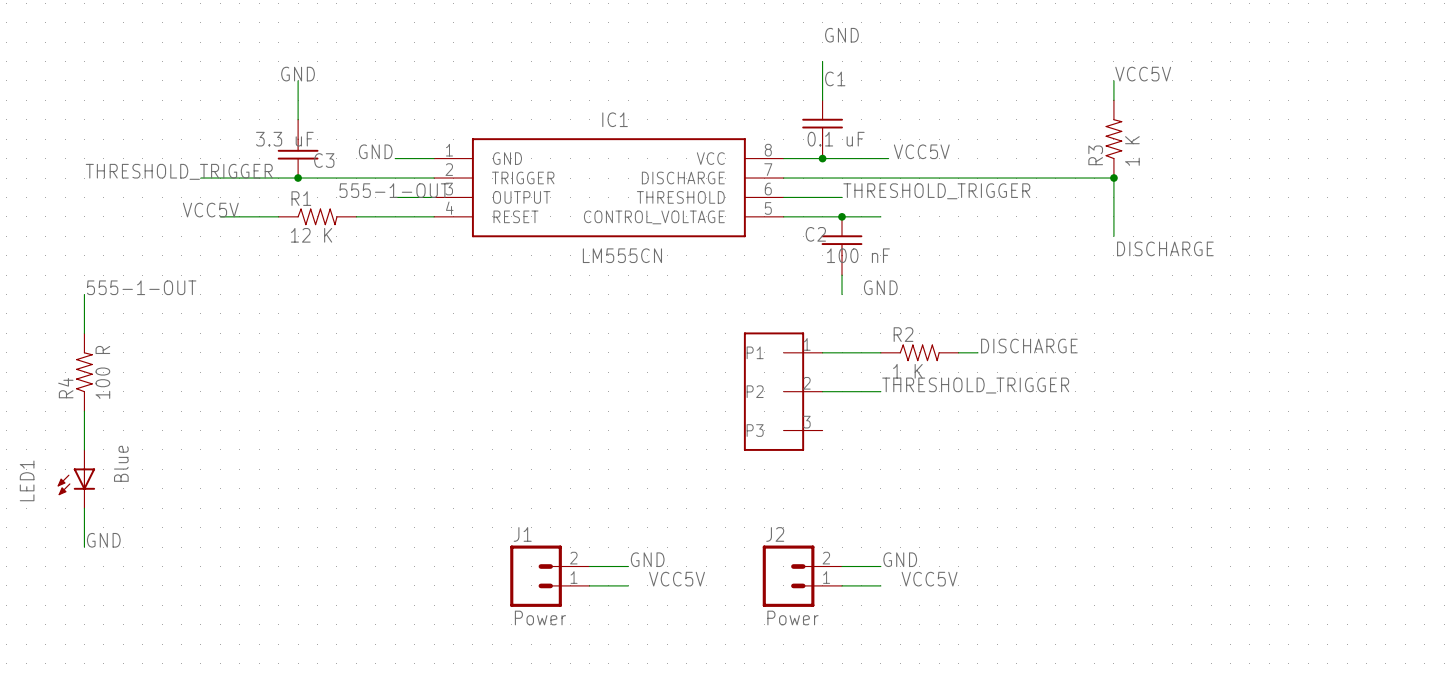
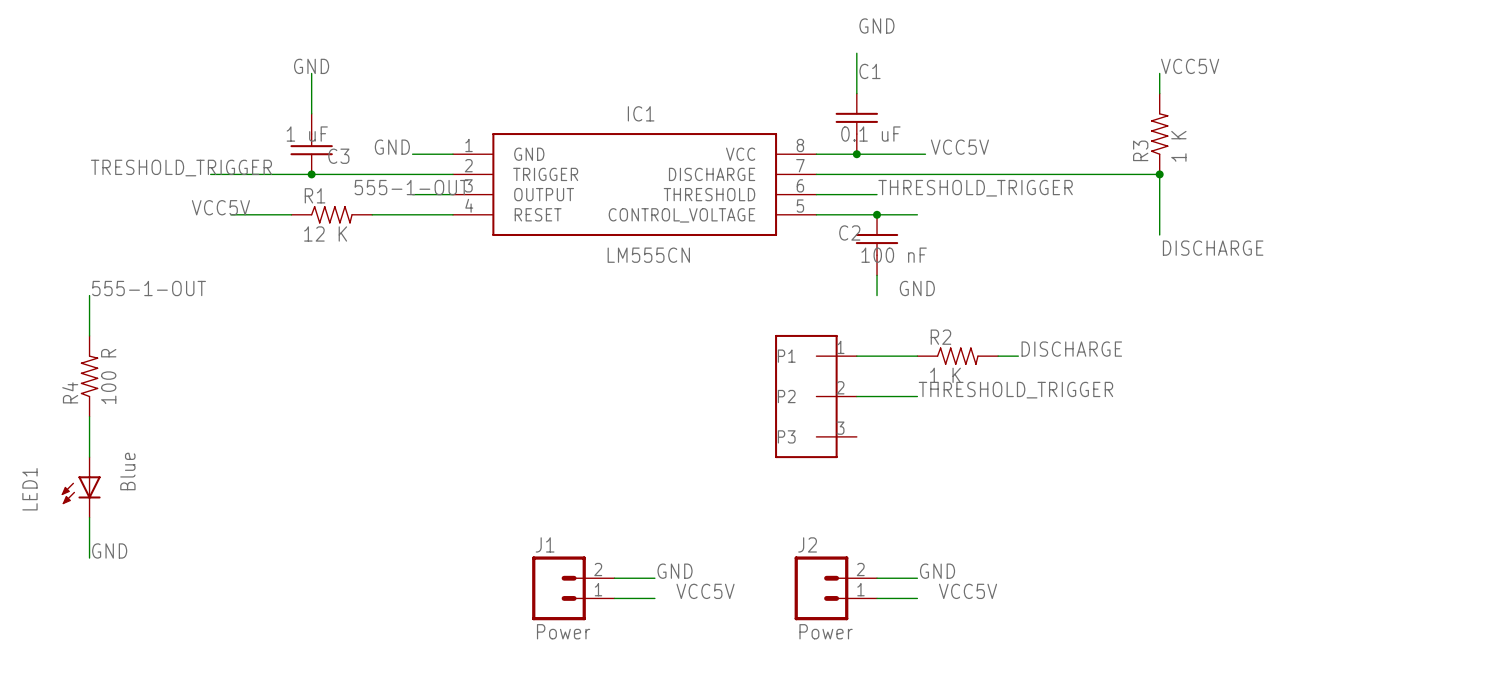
C3 value: 3.3 uF (284, 139) -> 1 uF (307, 134)
label: THRESHOLD_TRIGGER (179, 171) -> TRESHOLD_TRIGGER (181, 168)

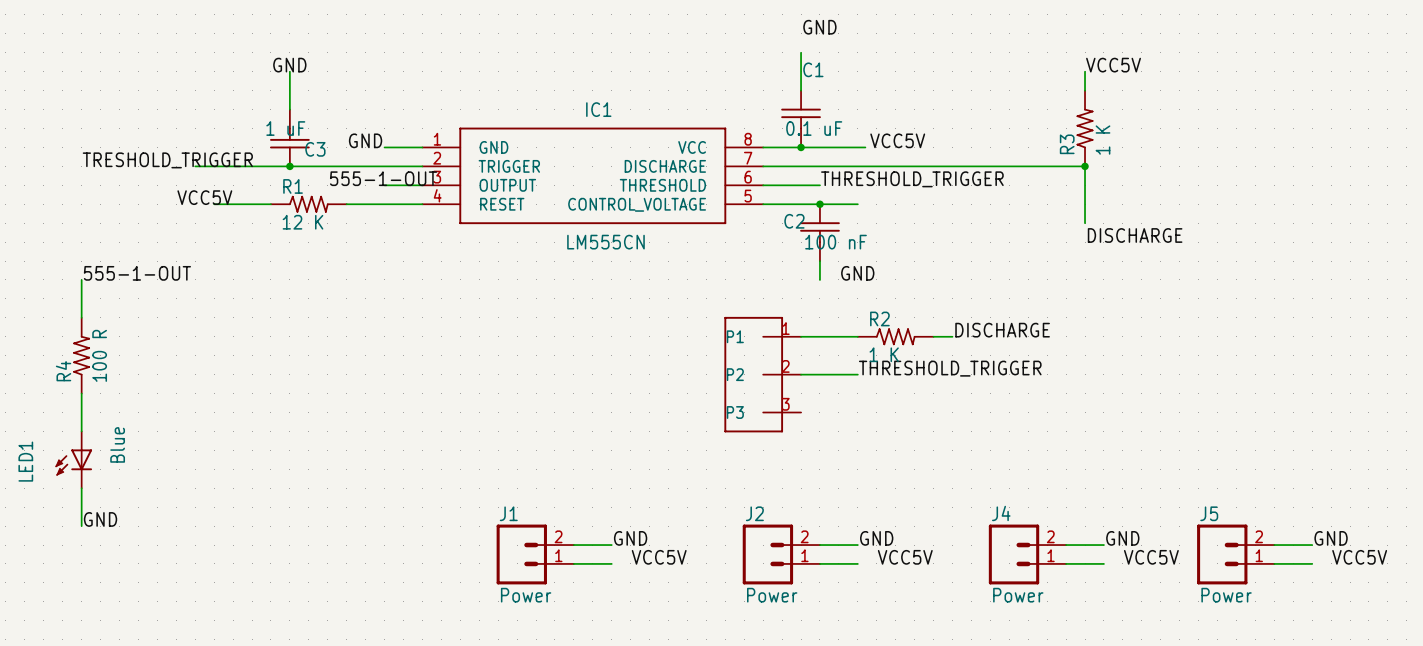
label: none -> GND (1122, 538)
label: none -> GND (1331, 538)
wire: none -> (1066, 545) (1103, 545)
wire: none -> (1274, 545) (1312, 545)
J4: none -> Power (1027, 554)
J5: none -> Power (1235, 554)
label: none -> VCC5V (1151, 557)
label: none -> VCC5V (1359, 557)
wire: none -> (1066, 563) (1103, 563)
wire: none -> (1274, 563) (1312, 563)

